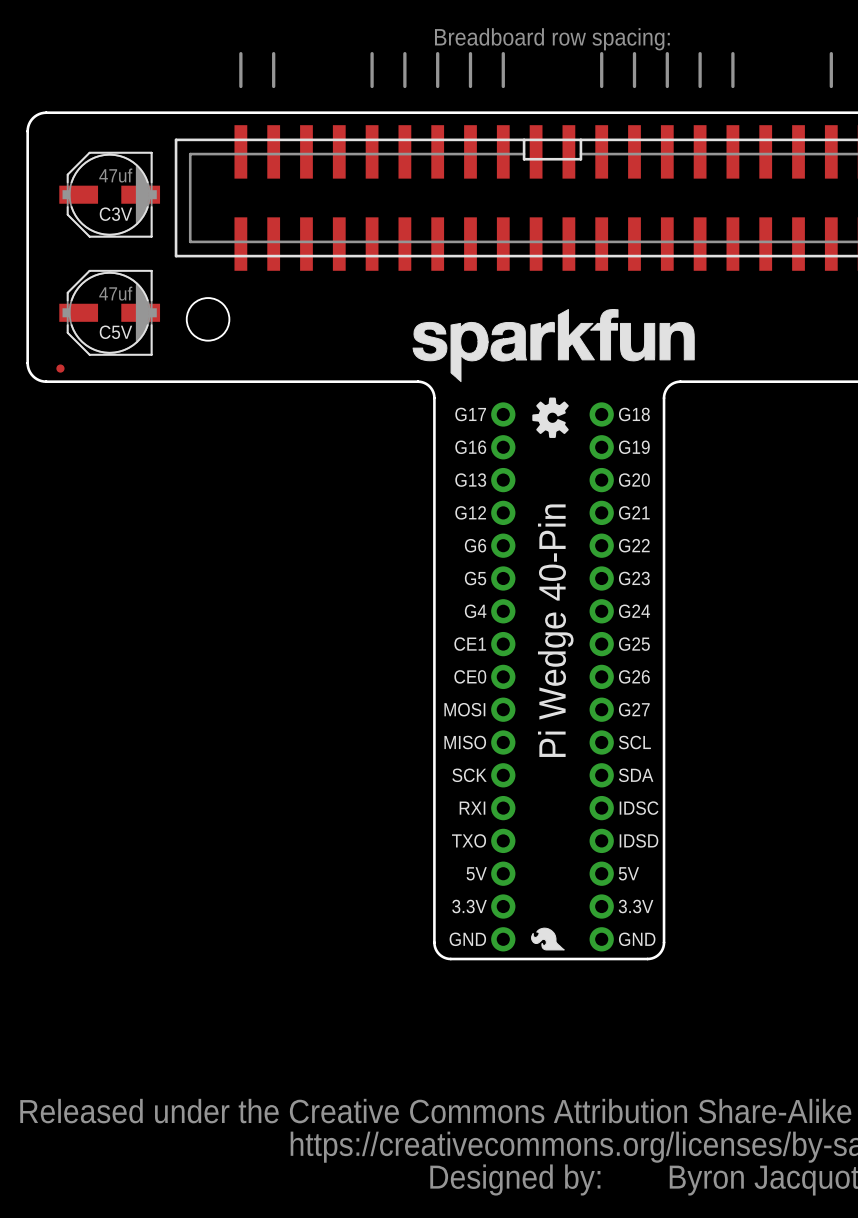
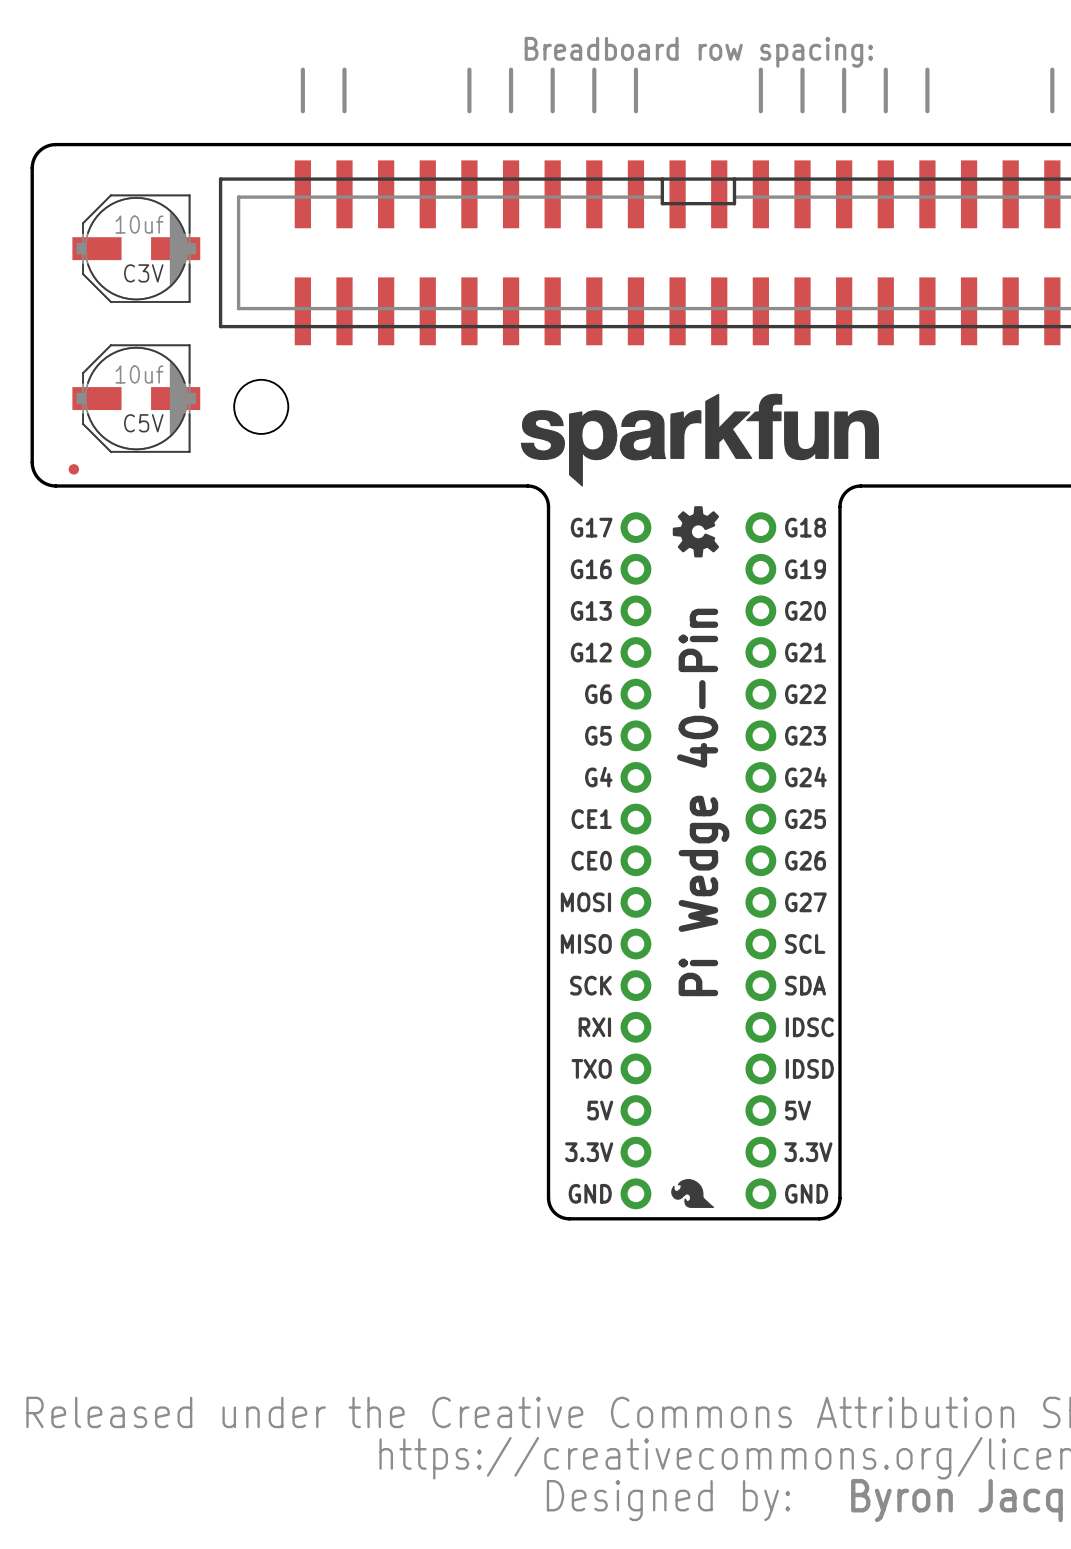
C3V value: 47uf (115, 175) -> 10uf (139, 224)
C5V value: 47uf (115, 293) -> 10uf (139, 374)

